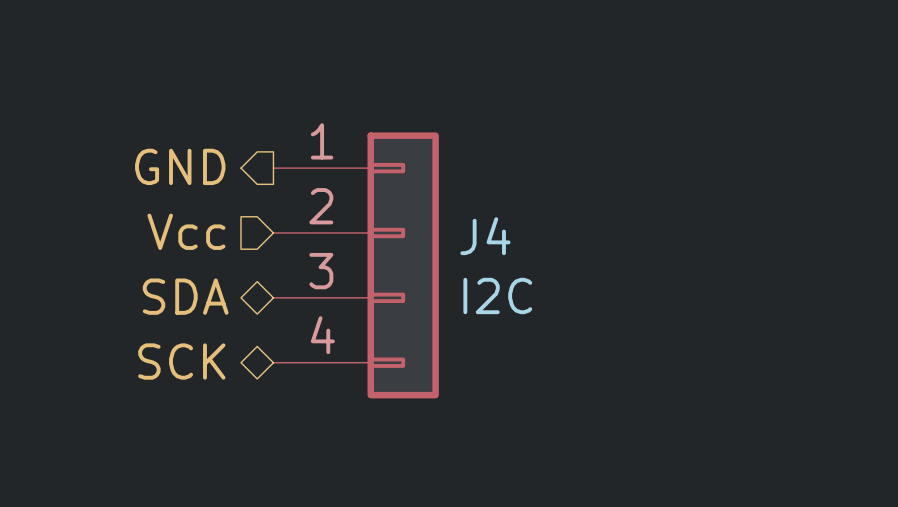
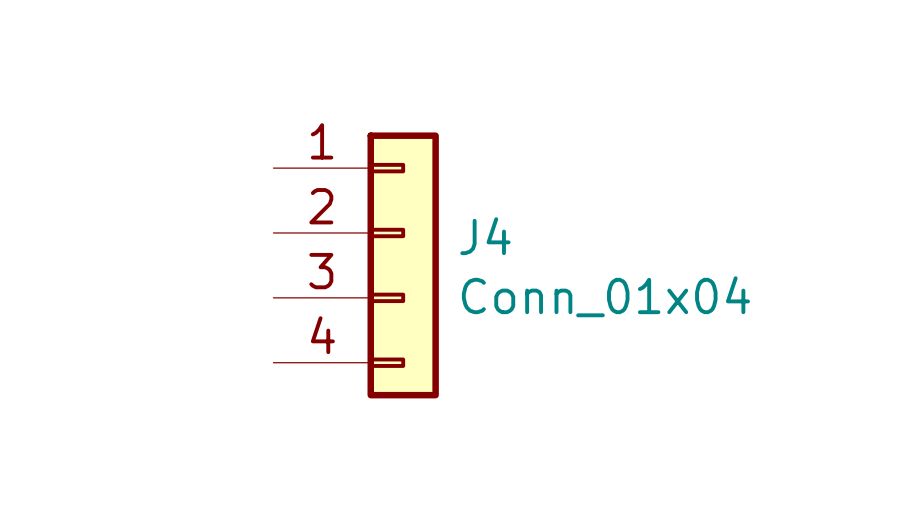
hierarchical label: GND (180, 166) -> none
hierarchical label: Vcc (186, 231) -> none
J4 value: I2C (497, 295) -> Conn_01x04 (605, 296)
hierarchical label: SDA (185, 296) -> none
hierarchical label: SCK (181, 361) -> none

